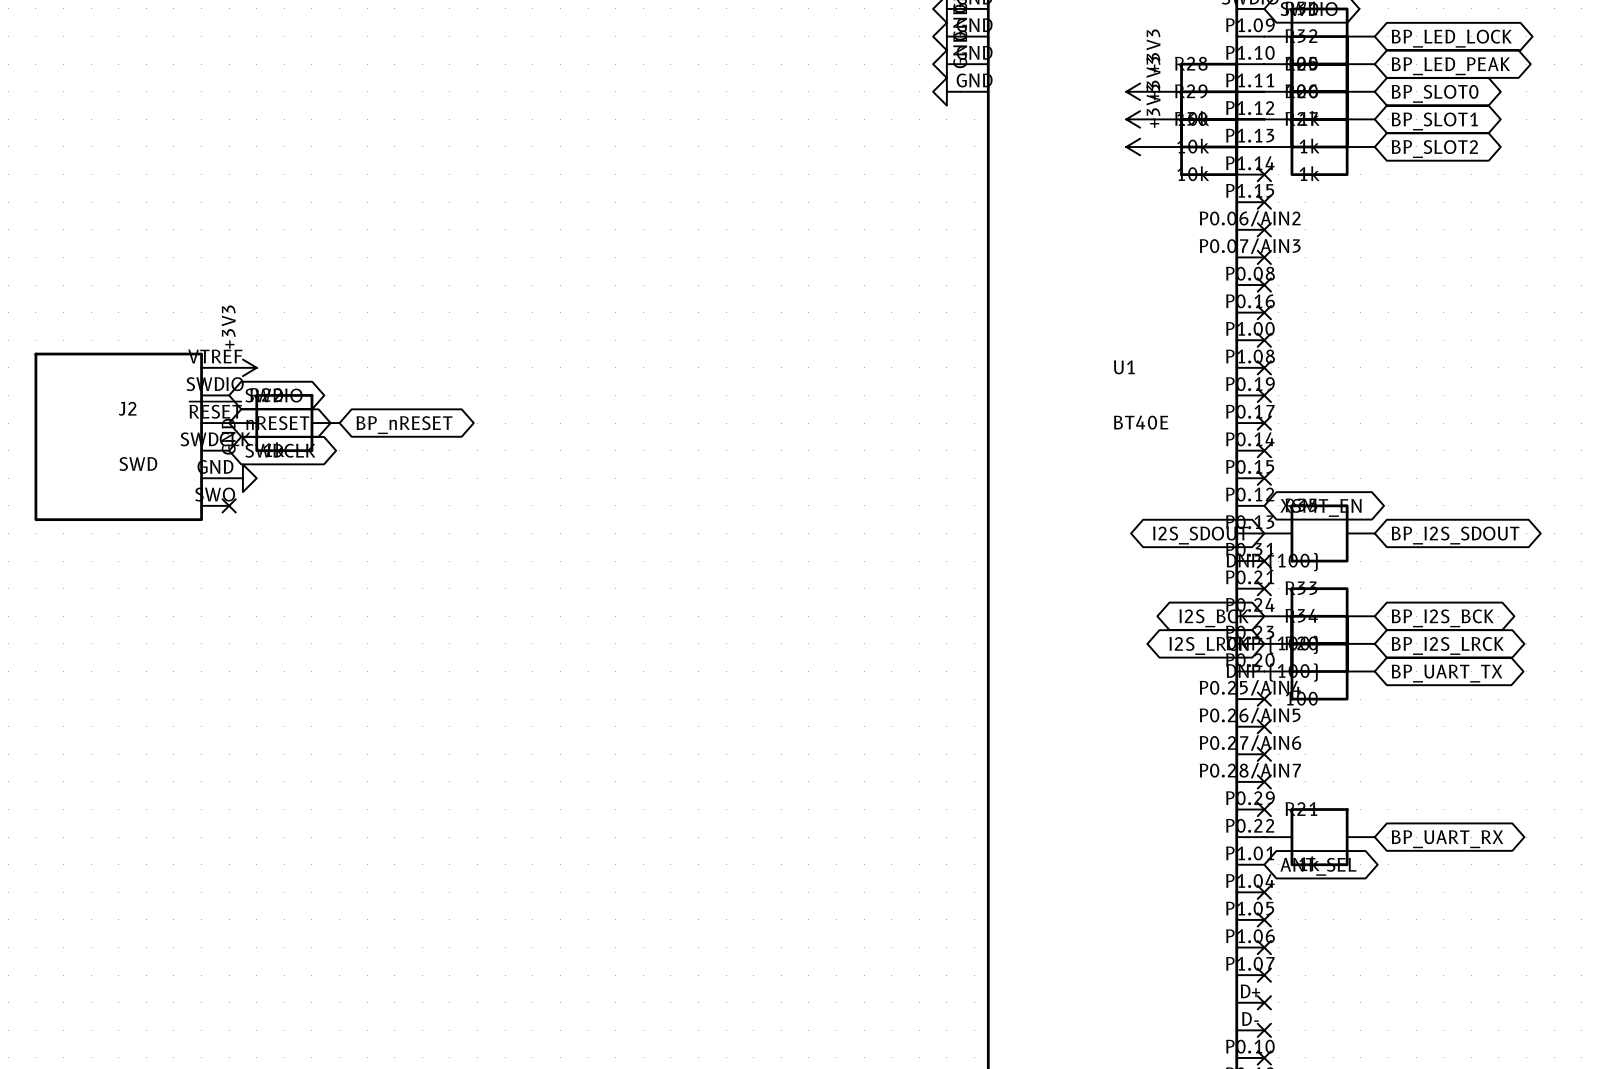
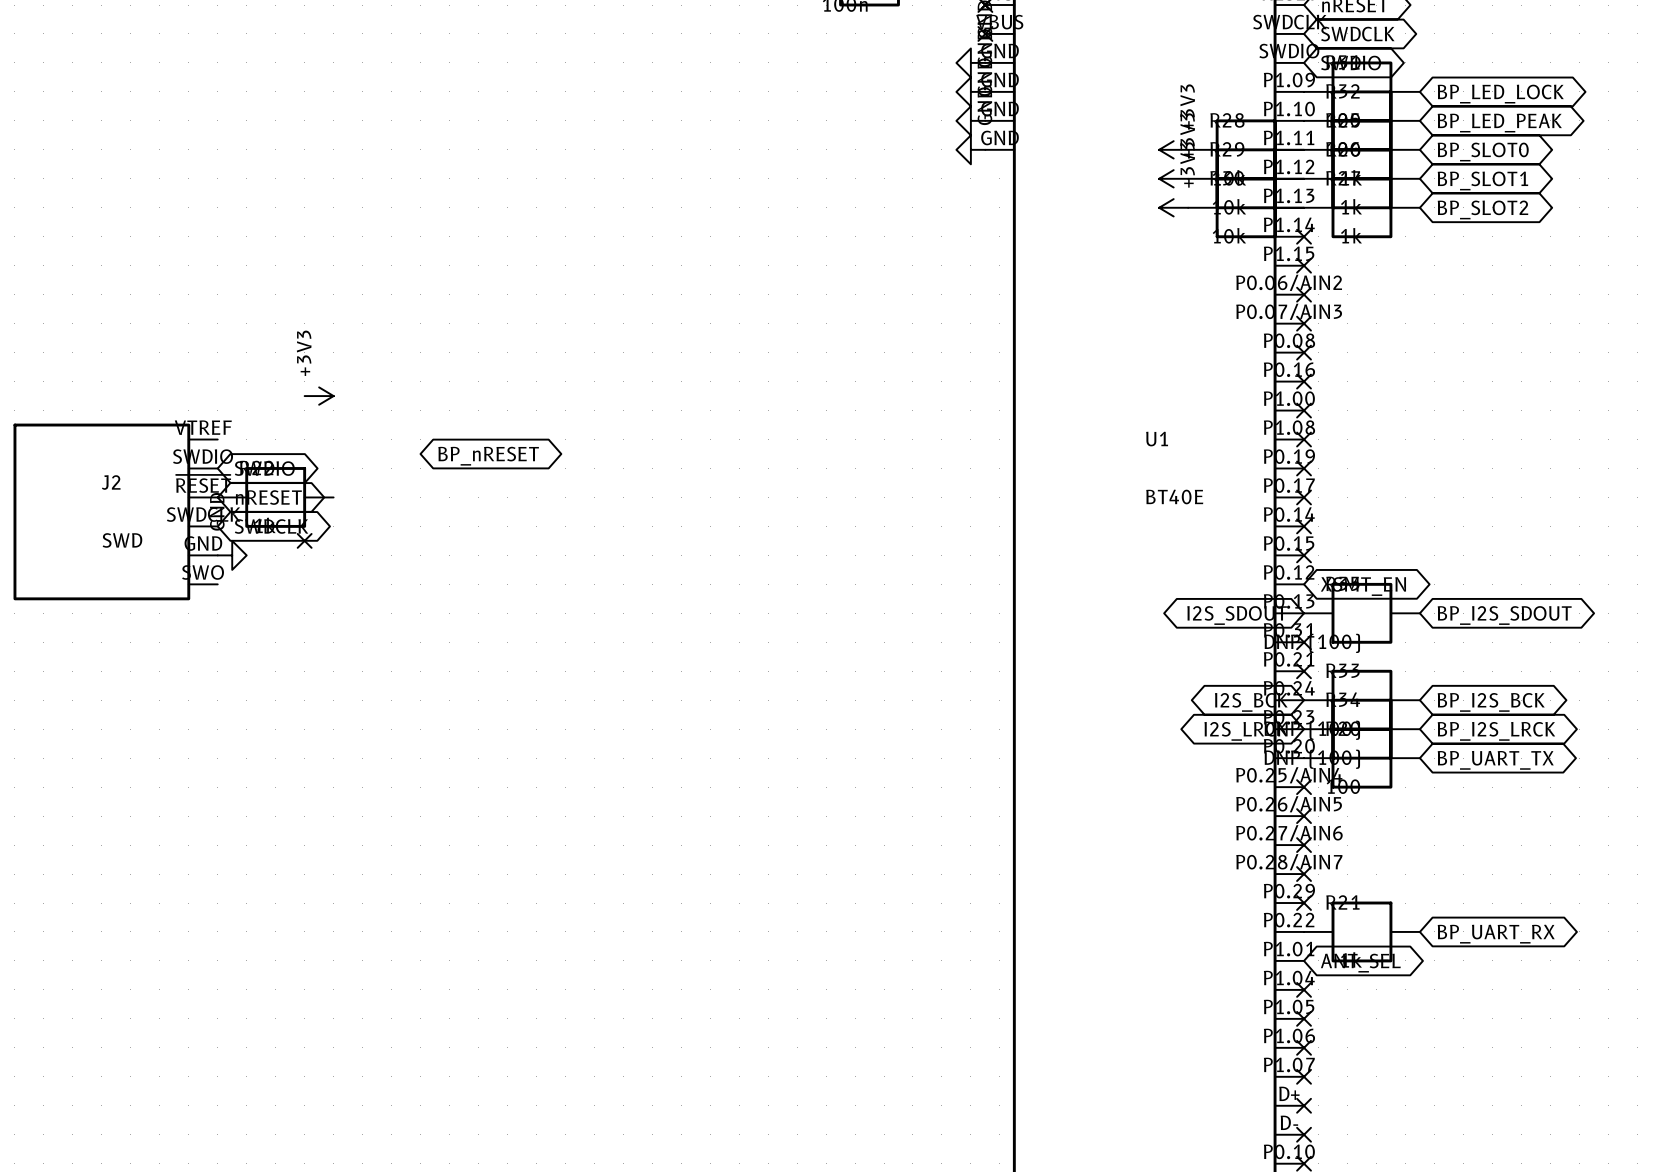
power symbol position: +3V3 (242, 367) -> +3V3 (319, 396)
global label position: BP_nRESET (404, 425) -> BP_nRESET (488, 456)
no-connect mark: none -> (304, 540)
no-connect mark: (229, 505) -> none

